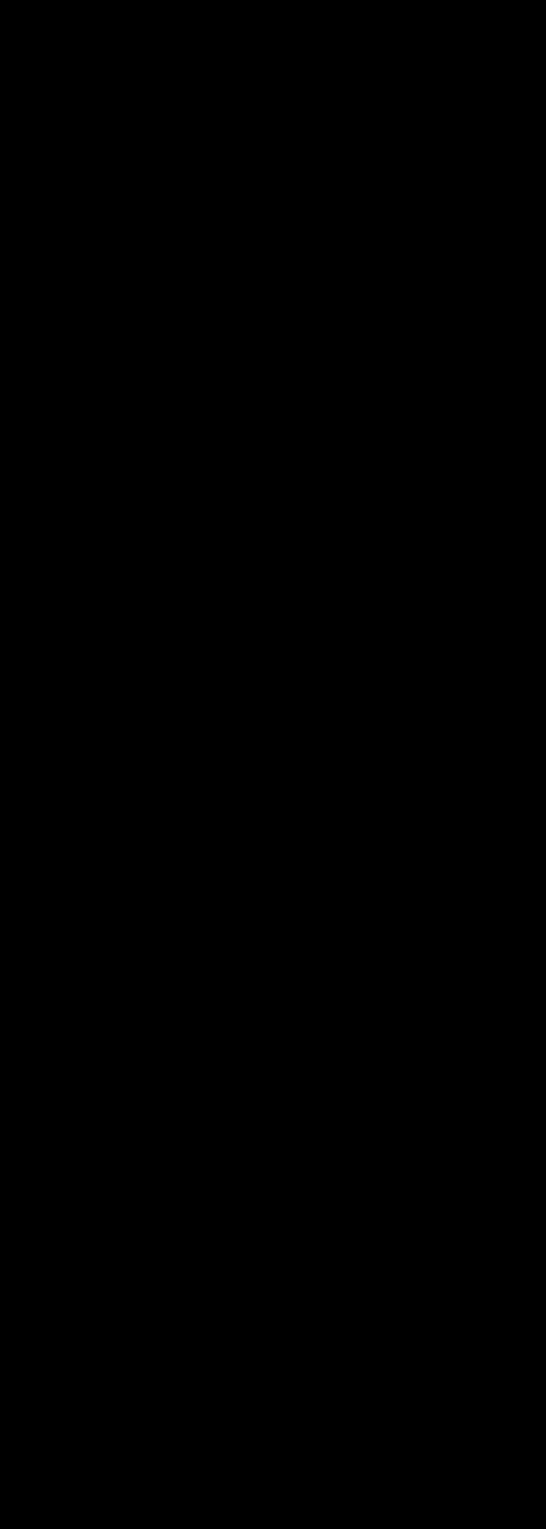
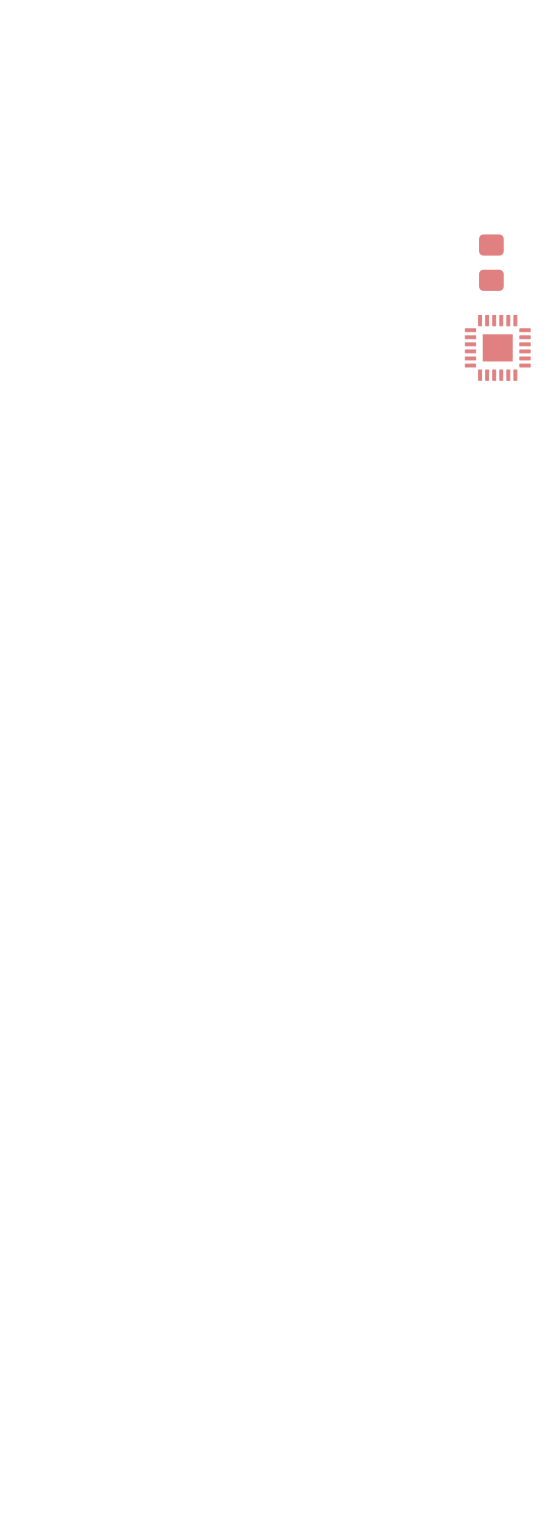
part: none -> (491, 262)
part: none -> (497, 347)

